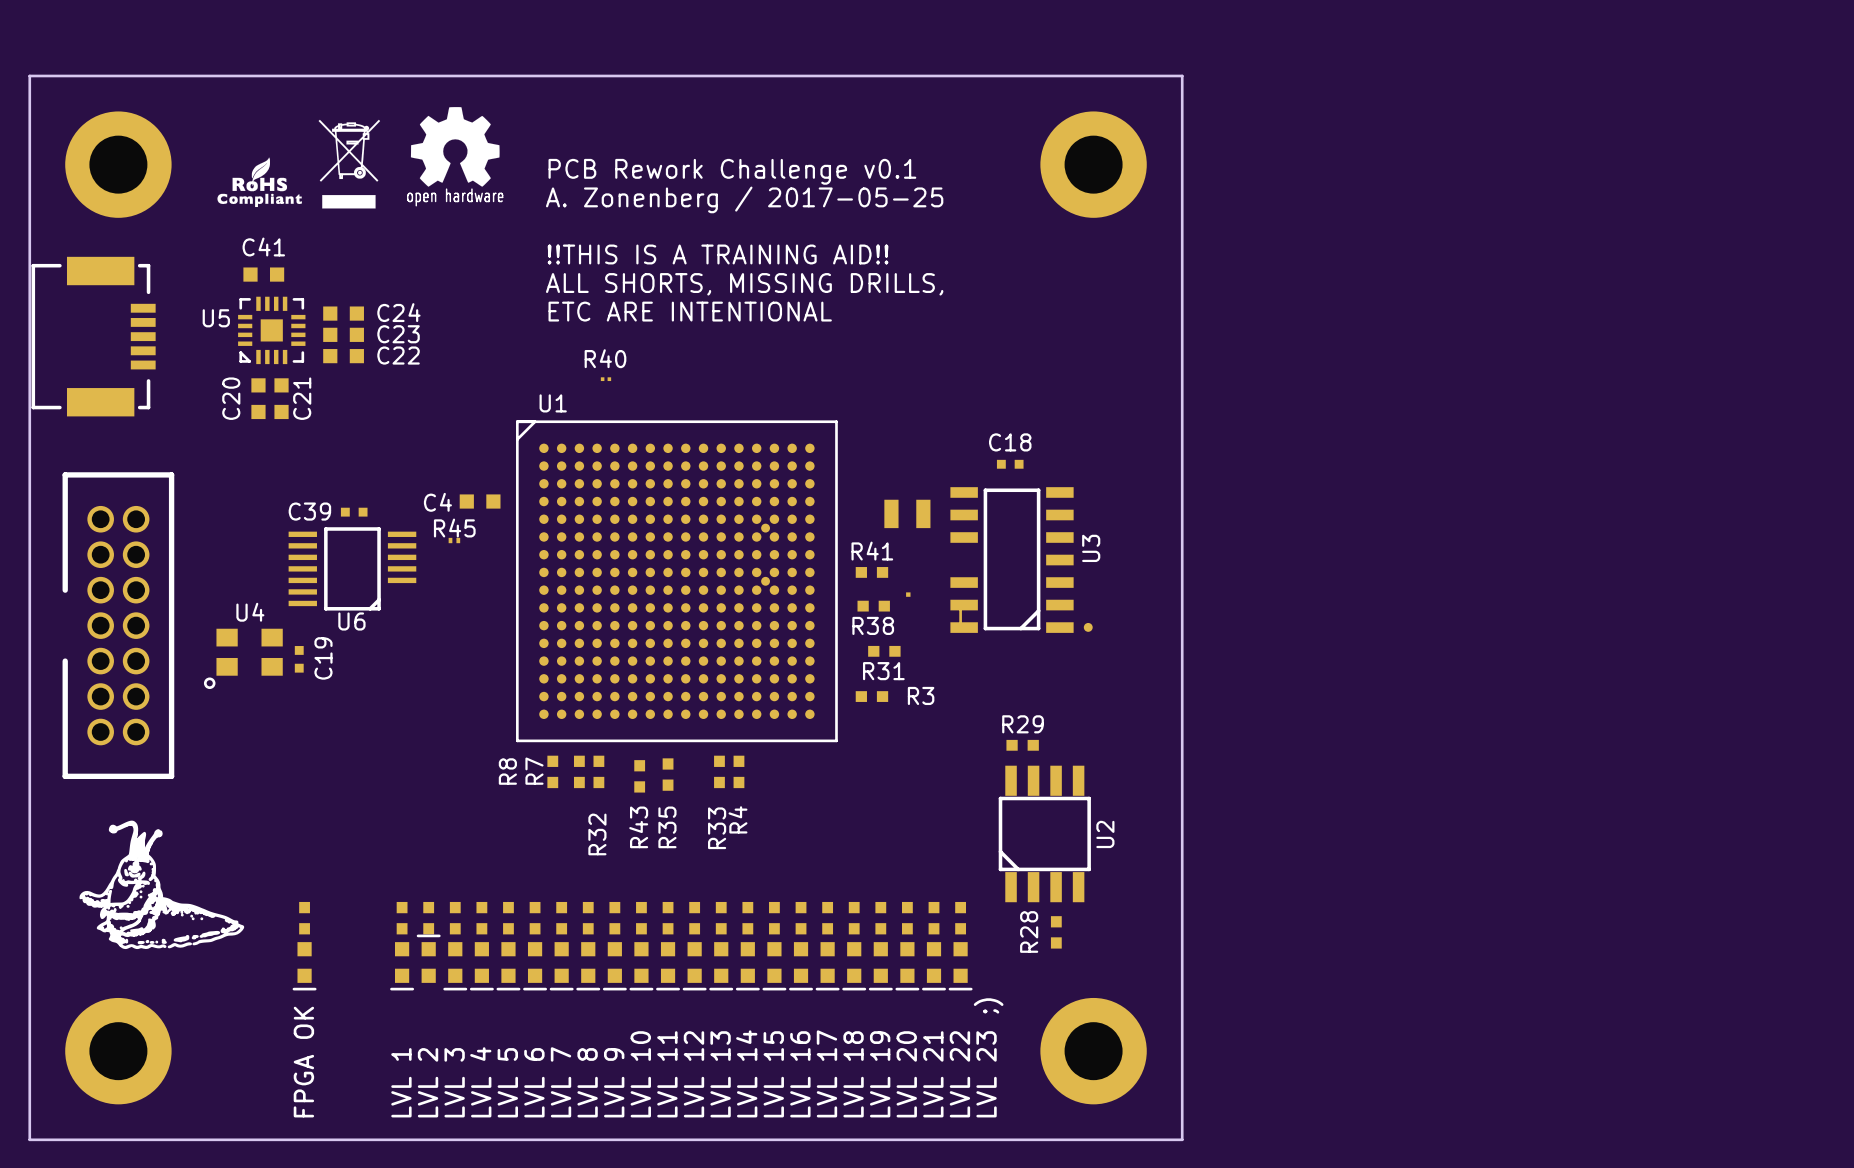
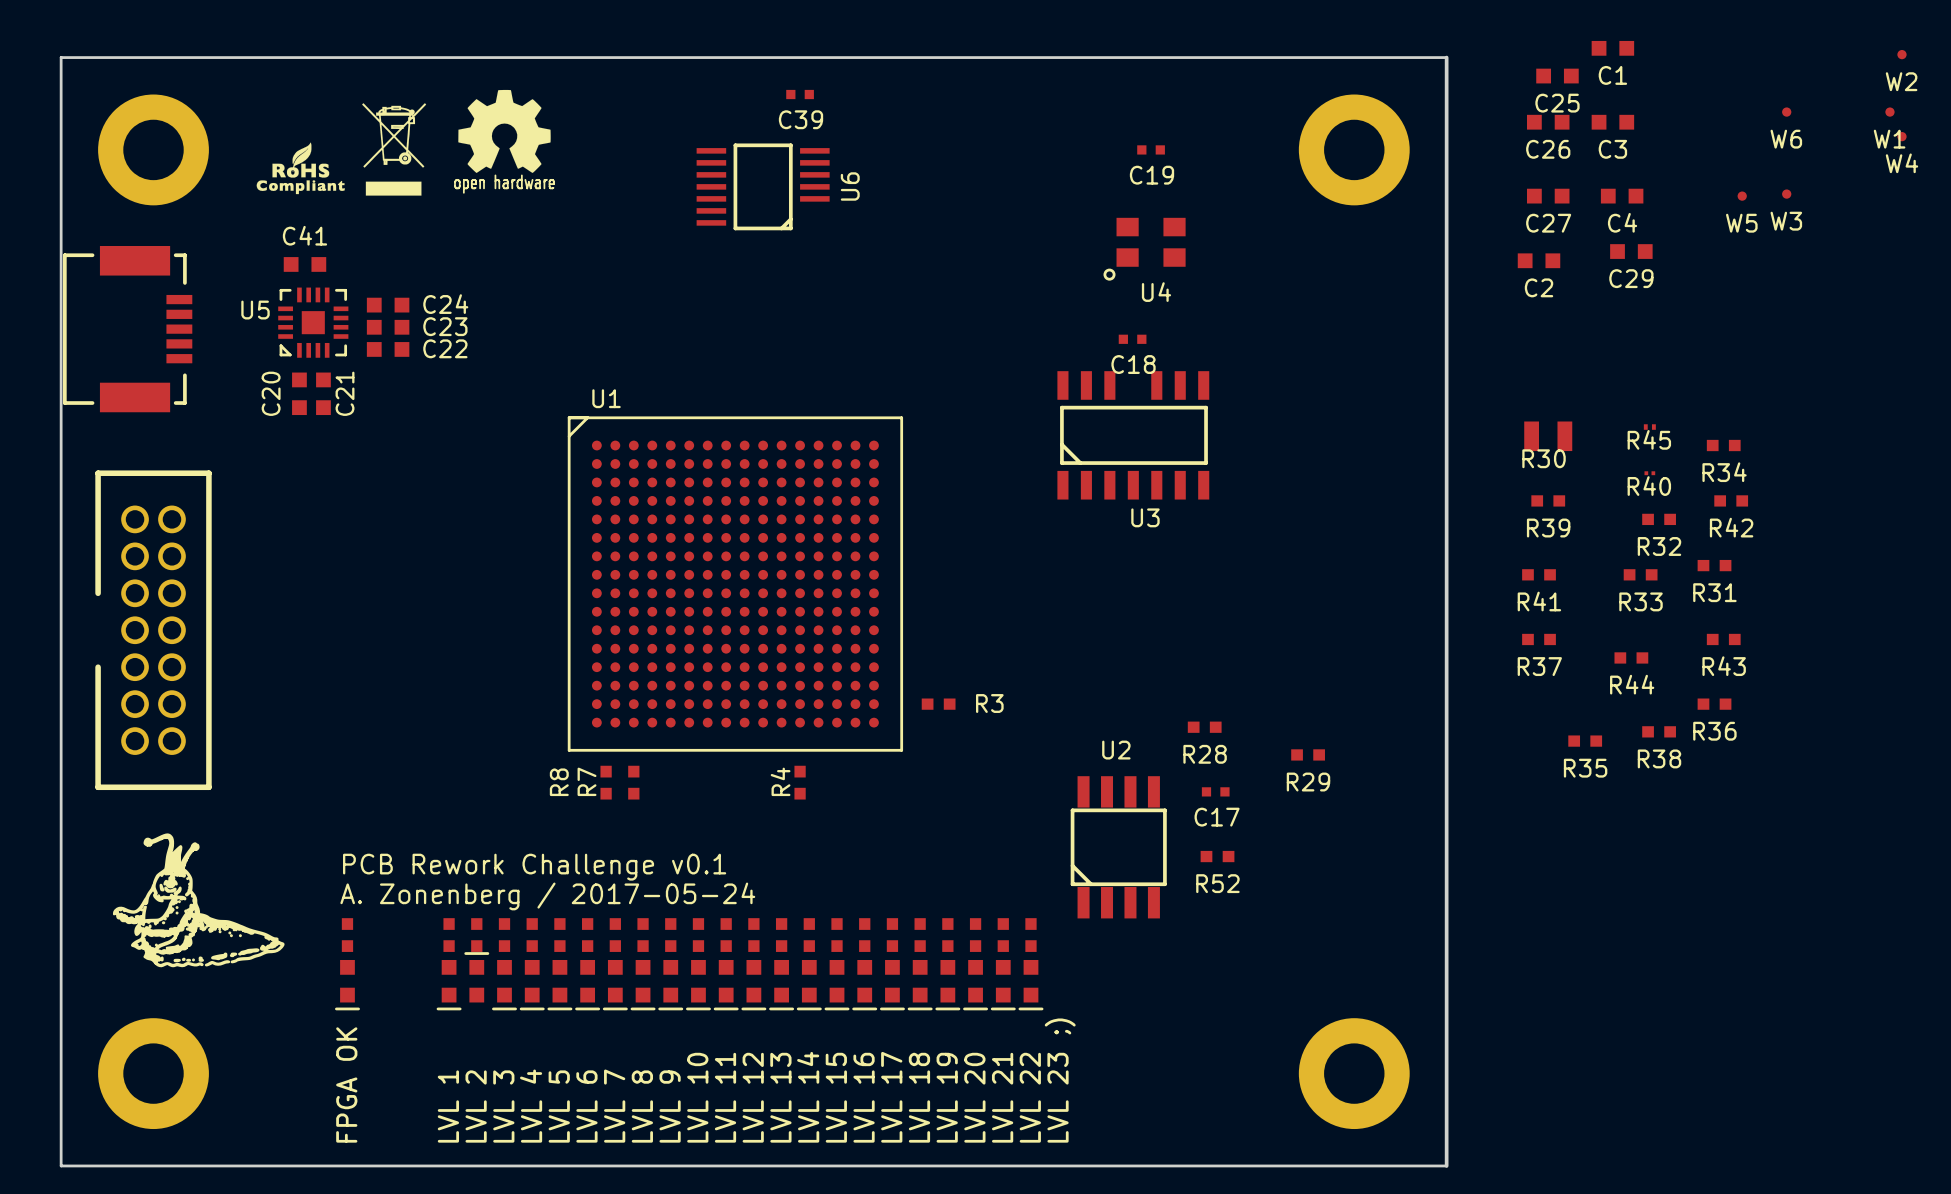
C1: none -> (1612, 48)
W2: none -> (1901, 54)
board edge: (1182, 75) (1182, 1139) -> (1261, 57) (1446, 57) (1446, 1165) (1261, 1165)
C25: none -> (1557, 76)
W6: none -> (1786, 112)
W1: none -> (1889, 112)
C26: none -> (1548, 122)
C3: none -> (1612, 122)
W4: none -> (1901, 136)
part position: (1093, 164) -> (1354, 149)
text: PCB Rework Challenge v0.1 (732, 171) -> none
text: A. Zonenberg / 2017-05-25 (744, 199) -> none
W3: none -> (1786, 194)
C27: none -> (1548, 196)
W5: none -> (1742, 196)
text: !!THIS IS A TRAINING AID!! (718, 254) -> none
C29: none -> (1631, 251)
C2: none -> (1539, 260)
text: ALL SHORTS, MISSING DRILLS, (744, 284) -> none
text: ETC ARE INTENTIONAL (690, 311) -> none
R40 name position: R40 (605, 358) -> R40 (1649, 486)
R40 position: (605, 379) -> (1649, 473)
R30: none -> (1548, 436)
C18 name position: C18 (1010, 442) -> C18 (1133, 364)
R34: none -> (1723, 445)
C18 position: (1010, 464) -> (1132, 339)
C4 position: (480, 501) -> (1622, 196)
R39: none -> (1548, 500)
R42: none -> (1731, 500)
C4 name position: C4 (437, 502) -> C4 (1622, 222)
C39 name position: C39 (309, 511) -> C39 (800, 119)
C39 position: (354, 512) -> (800, 94)
part: (907, 513) -> none
R45 name position: R45 (454, 528) -> R45 (1649, 439)
part: (765, 528) -> none
R45 position: (454, 540) -> (1649, 427)
R41 name position: R41 (872, 551) -> R41 (1539, 601)
U3 rotation: 0° (1012, 560) -> 90° clockwise (1133, 435)
U3 position: (1012, 560) -> (1133, 435)
U6 position: (352, 568) -> (763, 186)
R41 position: (871, 572) -> (1539, 574)
part: (765, 581) -> none
part: (908, 594) -> none
R38 position: (873, 606) -> (1659, 731)
U4 name position: U4 (250, 612) -> U4 (1156, 292)
part: (960, 615) -> none
U6 name rotation: 0° (351, 621) -> 90° counterclockwise (850, 186)
U6 name position: U6 (351, 621) -> U6 (850, 186)
R38 name position: R38 (873, 625) -> R38 (1659, 758)
part: (1088, 627) -> none
R37: none -> (1539, 639)
R31 position: (884, 651) -> (1714, 565)
R44: none -> (1631, 657)
U4 position: (243, 658) -> (1144, 249)
C19 rotation: 0° (299, 659) -> 90° clockwise (1151, 149)
C19 position: (299, 659) -> (1151, 149)
R31 name position: R31 (883, 671) -> R31 (1714, 592)
R36: none -> (1714, 704)
R29 name position: R29 (1023, 724) -> R29 (1308, 782)
R29 position: (1022, 745) -> (1308, 754)
R32 rotation: 0° (598, 771) -> 90° clockwise (1659, 519)
R32 position: (598, 771) -> (1659, 519)
R33 rotation: 0° (719, 771) -> 90° clockwise (1640, 574)
R33 position: (719, 771) -> (1640, 574)
R35 rotation: 0° (668, 774) -> 90° clockwise (1585, 741)
R35 position: (668, 774) -> (1585, 741)
R43 rotation: 0° (639, 776) -> 90° clockwise (1723, 639)
R43 position: (639, 776) -> (1723, 639)
C17: none -> (1215, 791)
R4 name position: R4 (737, 819) -> R4 (780, 781)
R32 name position: R32 (597, 834) -> R32 (1659, 546)
U2 name rotation: 0° (1105, 834) -> 90° clockwise (1116, 750)
U2 name position: U2 (1105, 834) -> U2 (1116, 750)
R52: none -> (1217, 856)
text: none -> PCB Rework Challenge v0.1 (534, 867)
text: none -> A. Zonenberg / 2017-05-24 (547, 896)
R28 name position: R28 (1029, 931) -> R28 (1205, 754)
R28 rotation: 0° (1056, 932) -> 90° clockwise (1204, 727)
R28 position: (1056, 932) -> (1204, 727)
part position: (1093, 1051) -> (1354, 1073)

